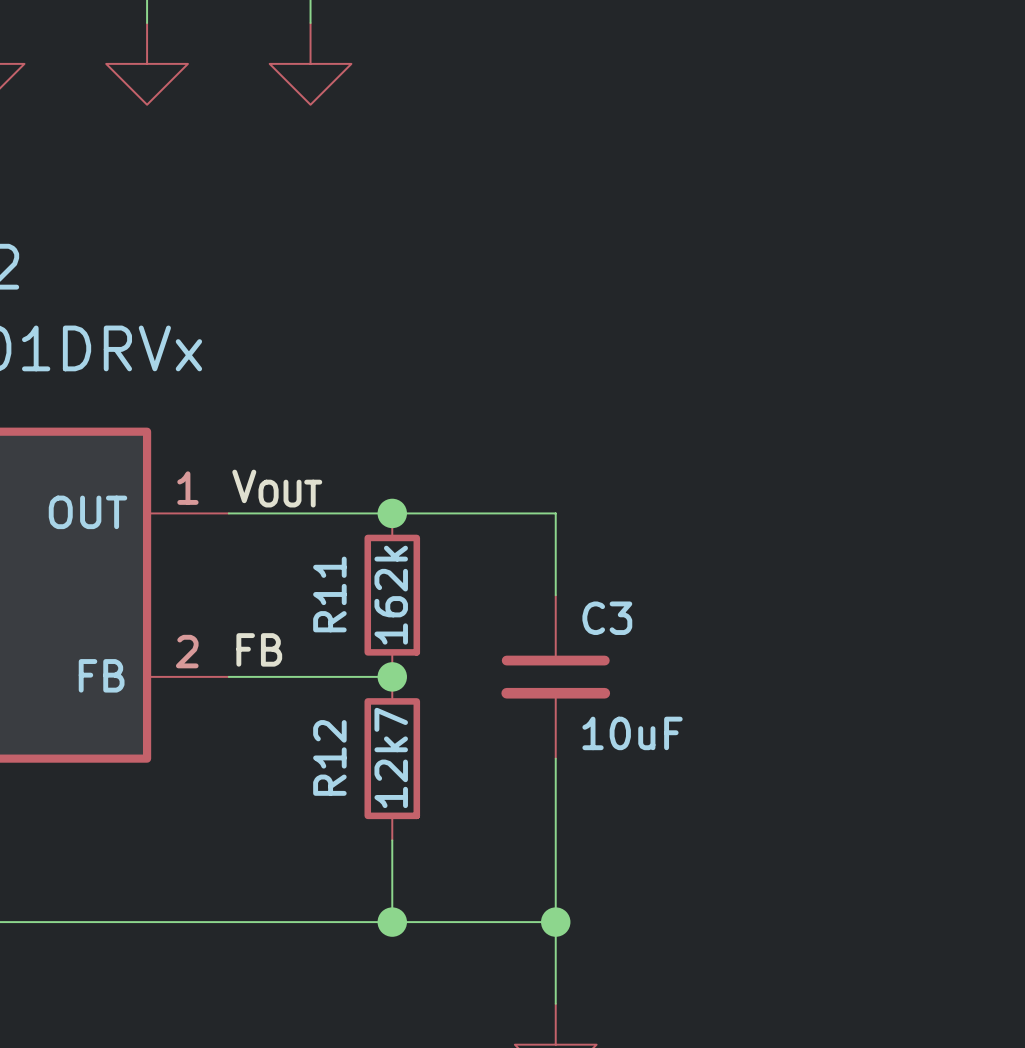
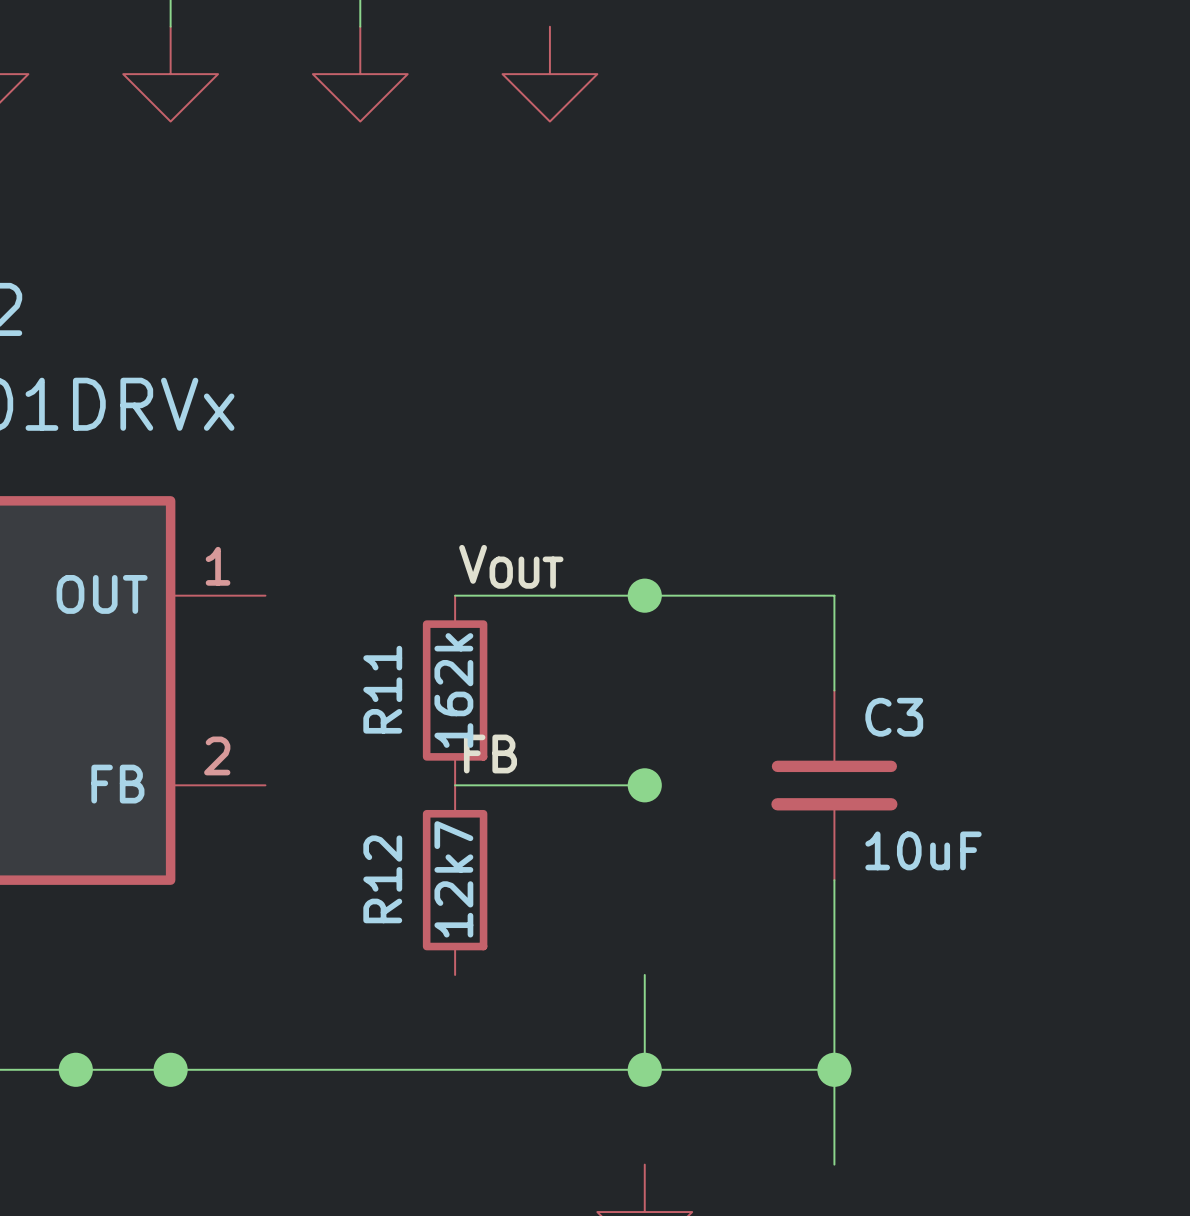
power symbol: none -> (549, 74)
label position: VOUT (277, 488) -> VOUT (511, 566)
wire: (228, 513) (392, 513) -> none
junction: (392, 513) -> none
wire: (555, 513) (555, 595) -> (644, 595) (834, 595) (834, 690)
junction: none -> (644, 595)
label position: FB (259, 649) -> FB (490, 754)
wire: (228, 676) (392, 676) -> (644, 785) (455, 785)
junction: (392, 676) -> none
junction: none -> (644, 785)
C3 position: (555, 676) -> (834, 785)
wire: (555, 758) (555, 840) -> none
wire: none -> (834, 880) (834, 1164)
wire: (392, 840) (392, 922) -> none
junction: none -> (75, 1069)
junction: none -> (170, 1069)
junction: (392, 922) -> none
wire: (555, 922) (555, 1003) -> (644, 1069) (834, 1069)
junction: none -> (834, 1069)

